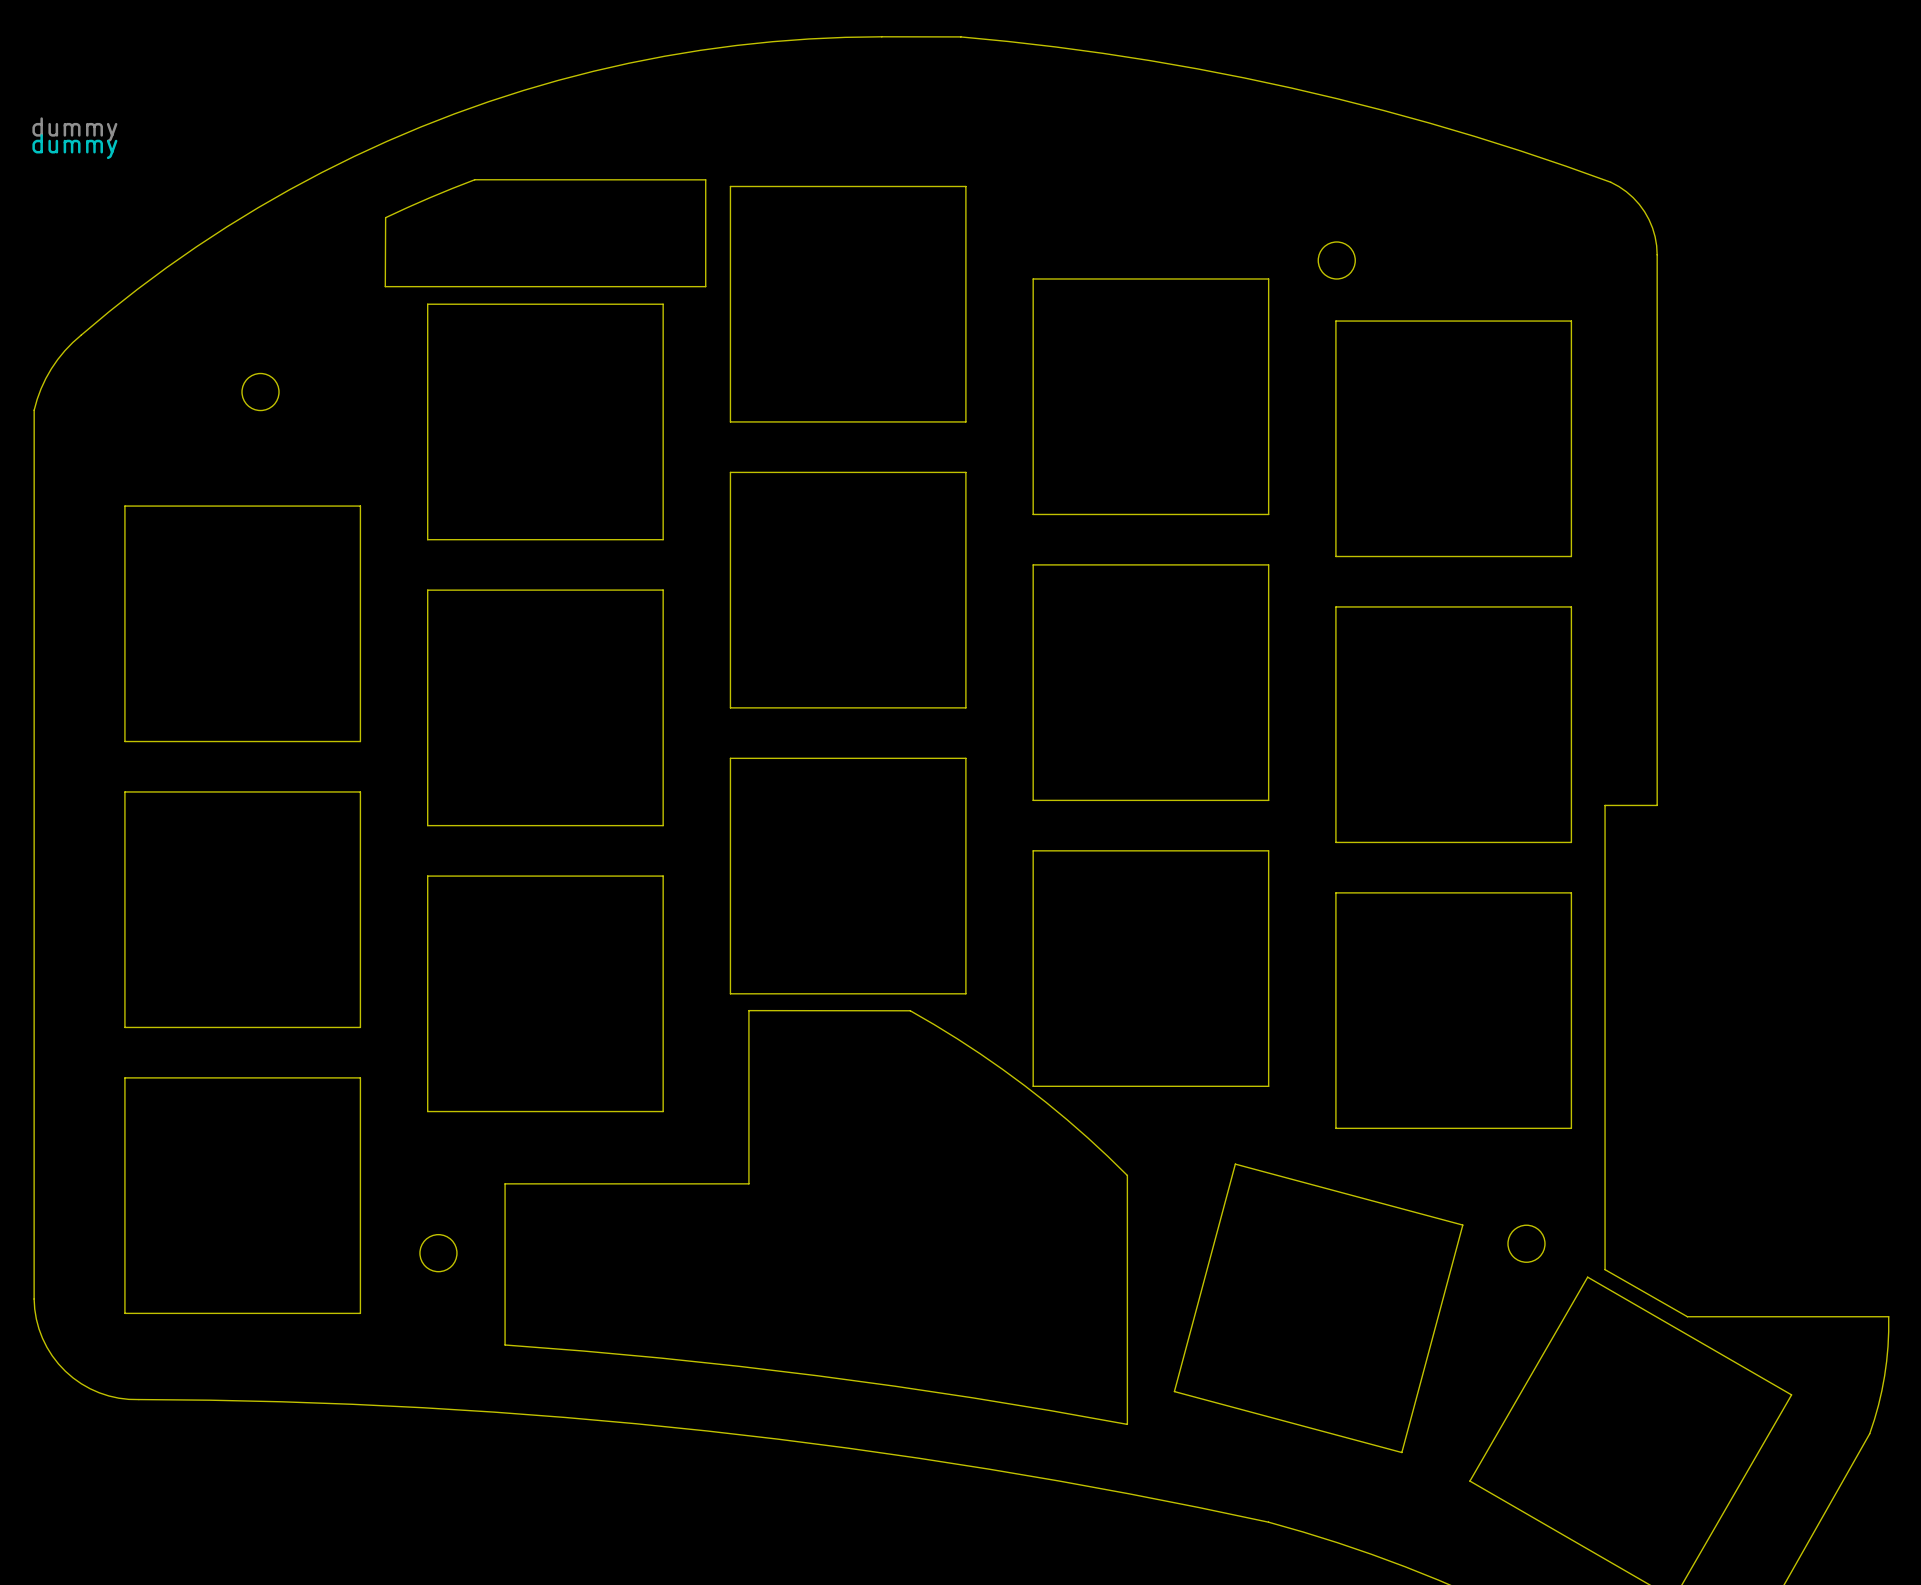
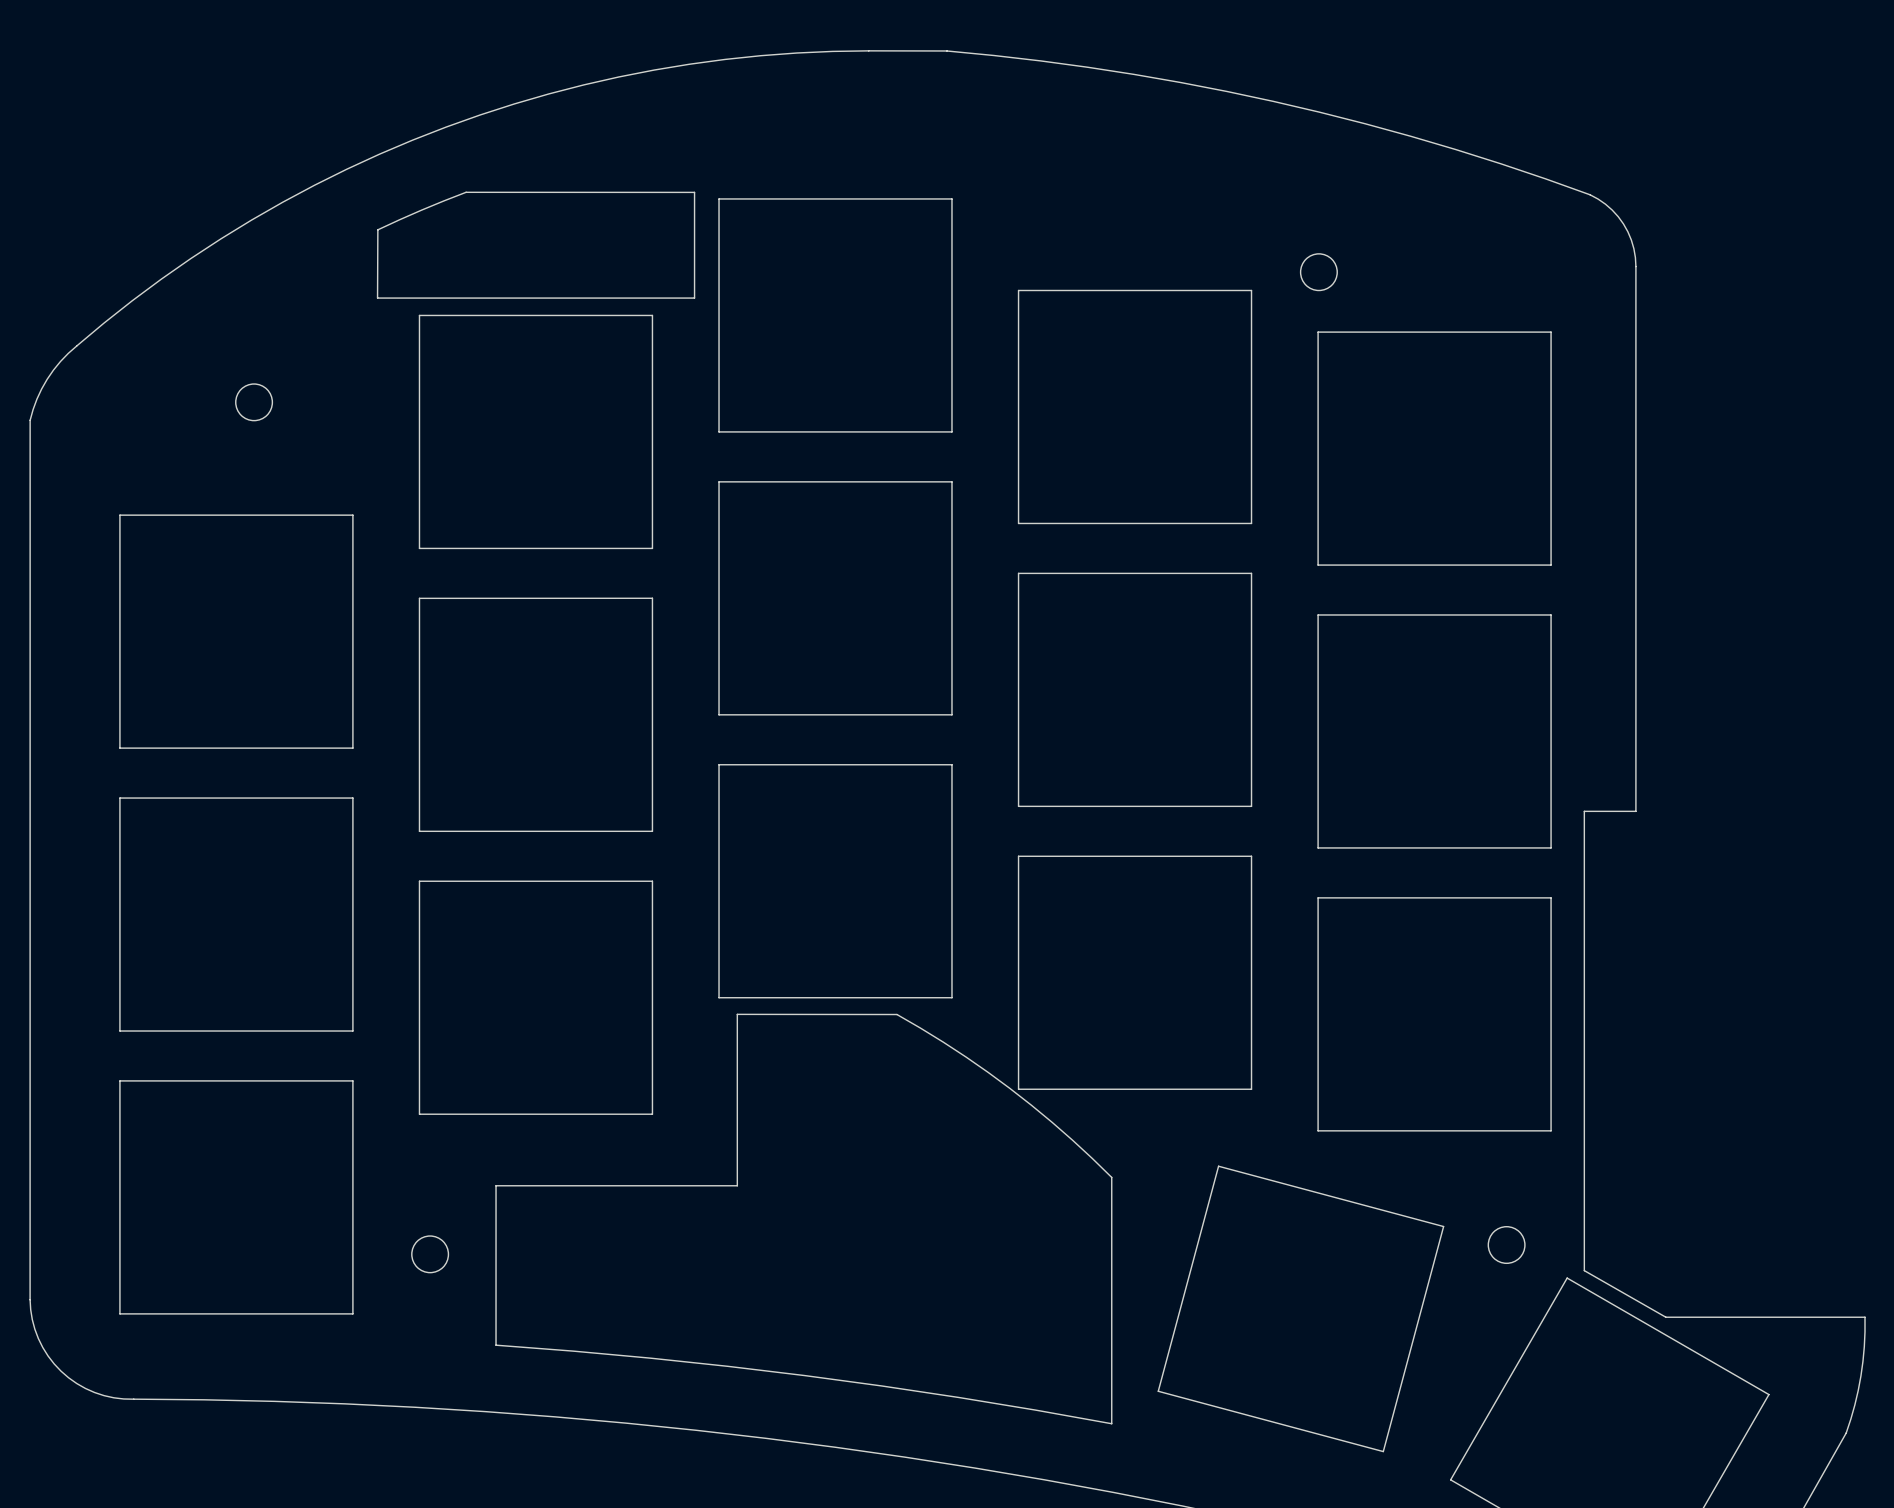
dummy: dummy (74, 138) -> none

